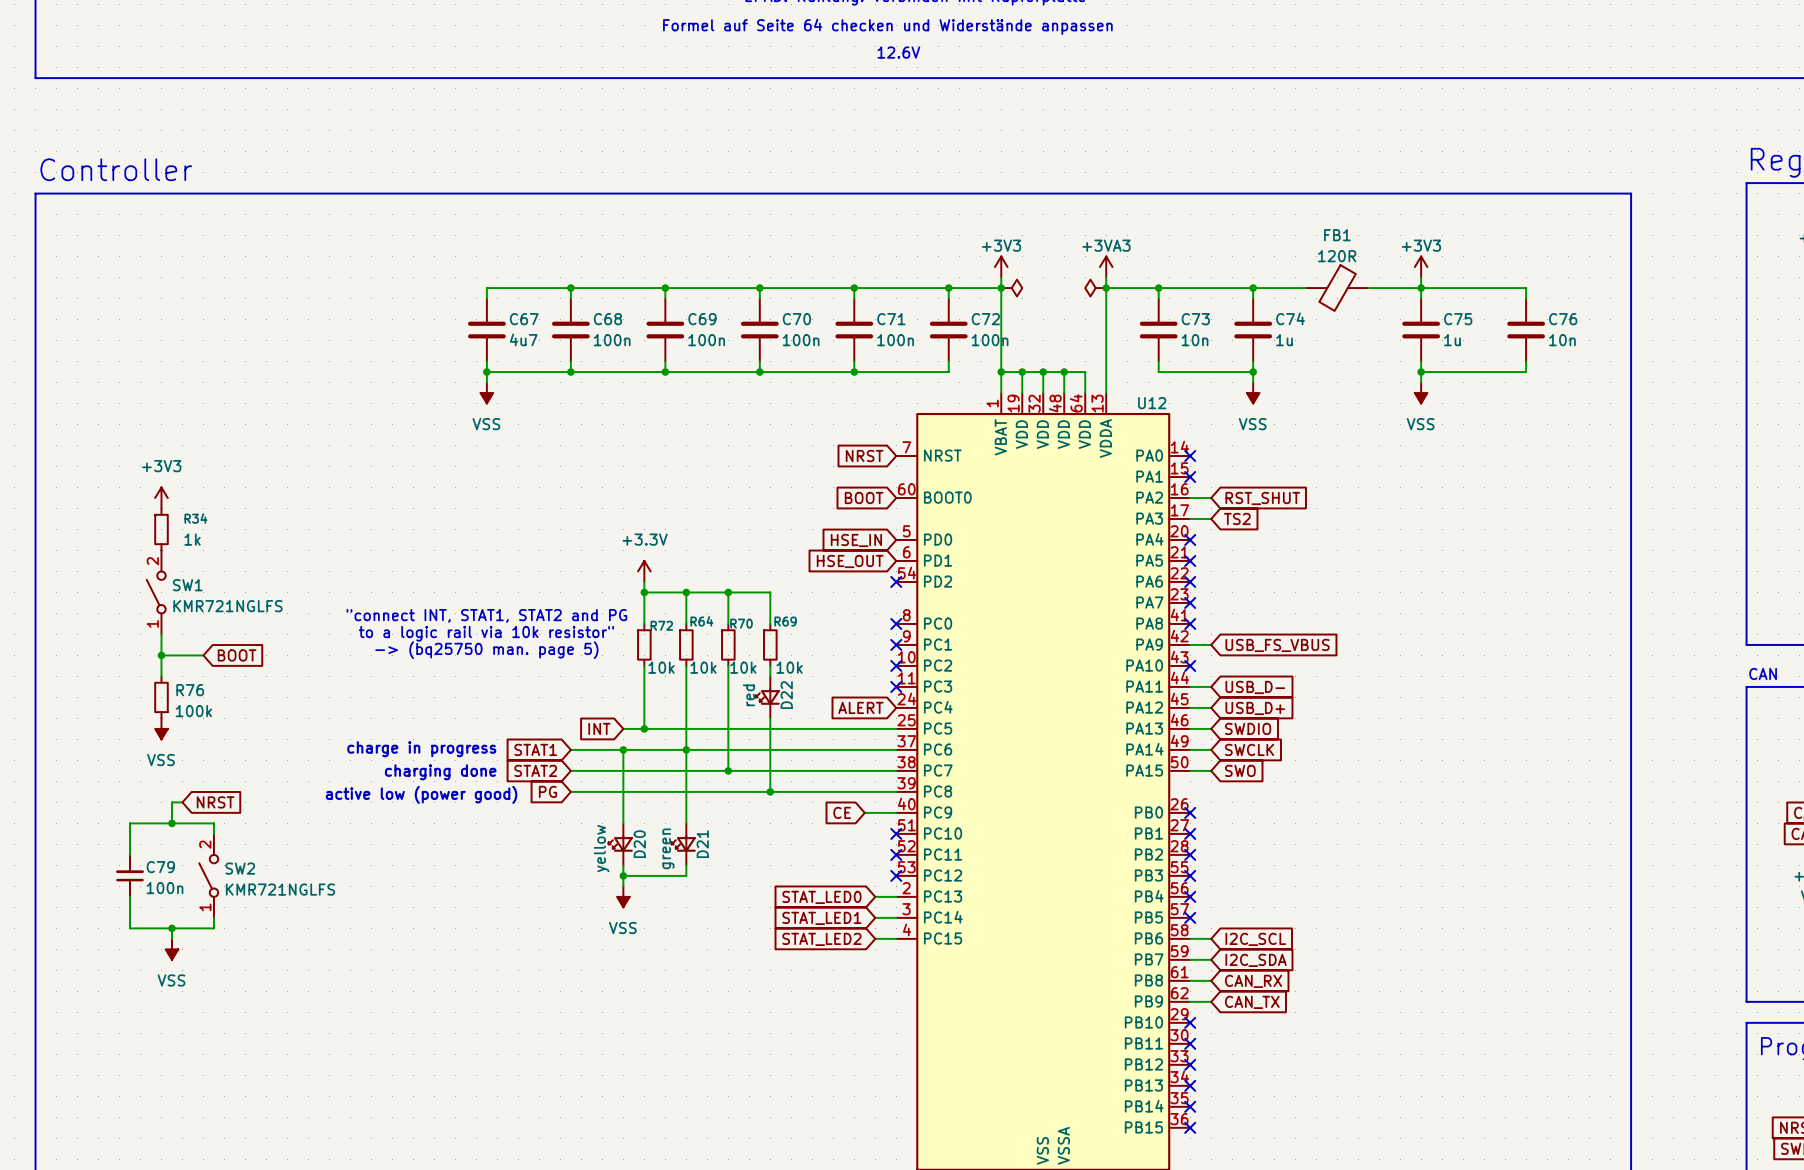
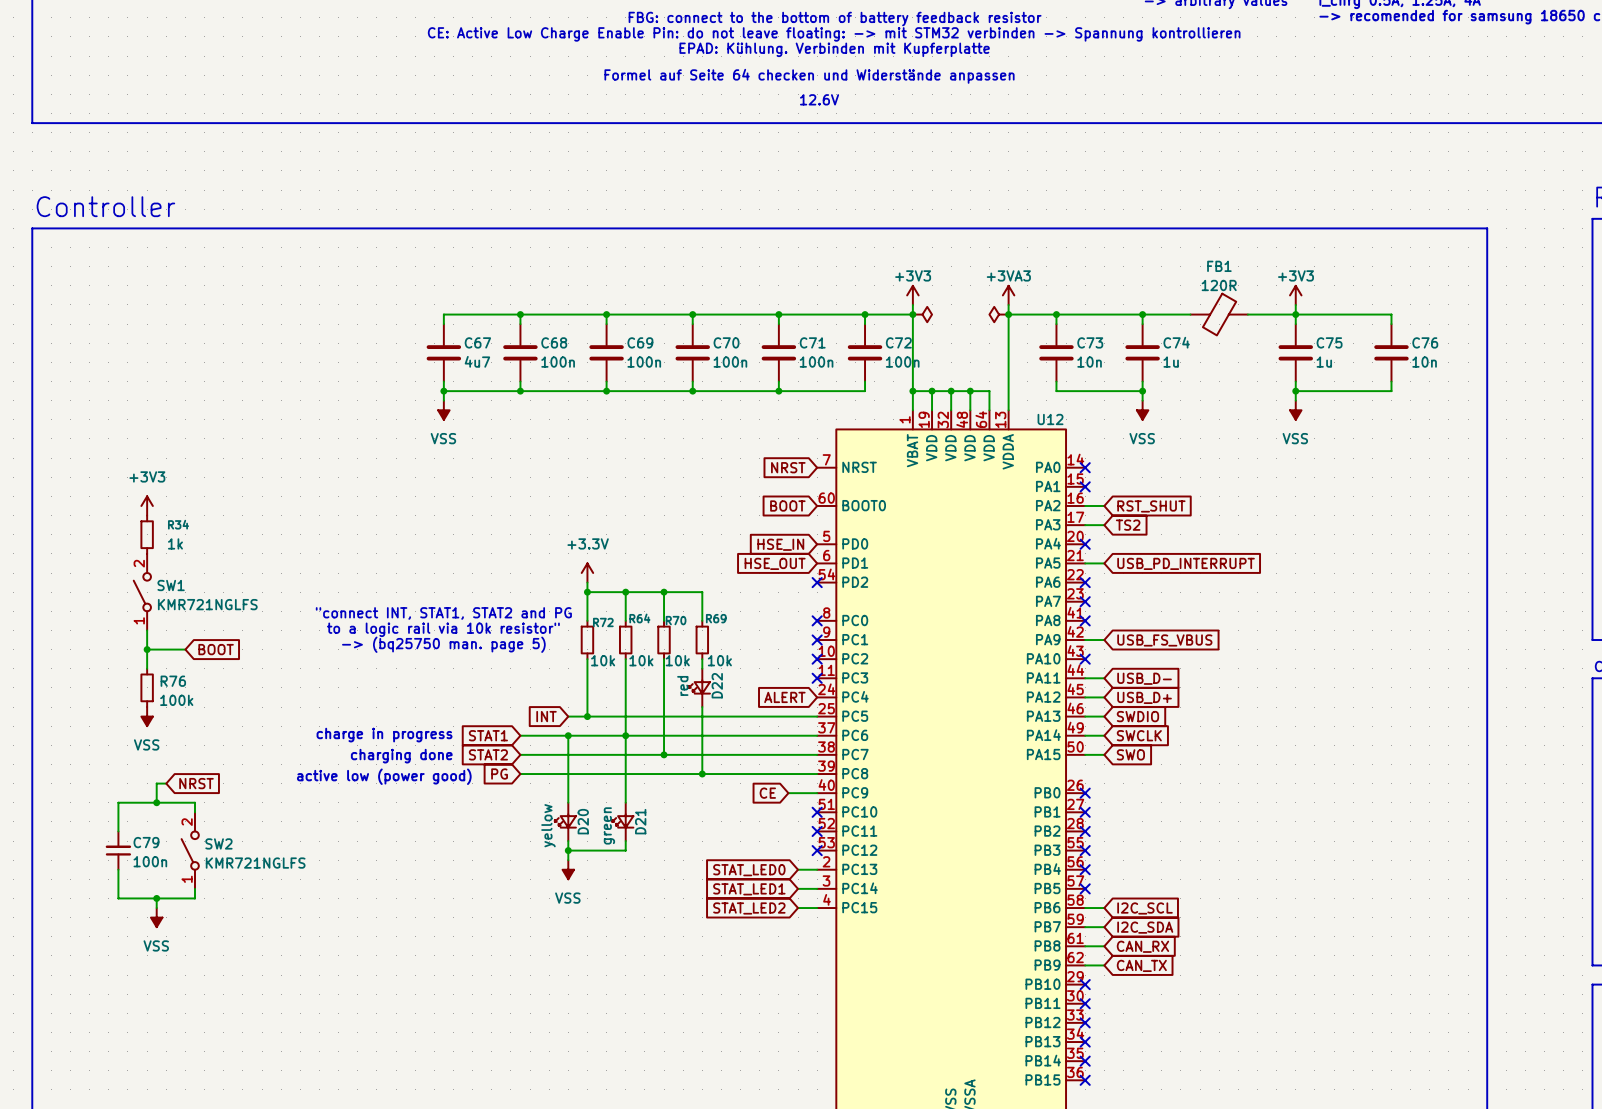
wire: none -> (1085, 563) (1104, 563)
no-connect mark: (1190, 560) -> none
global label: none -> USB_PD_INTERRUPT (1186, 563)

